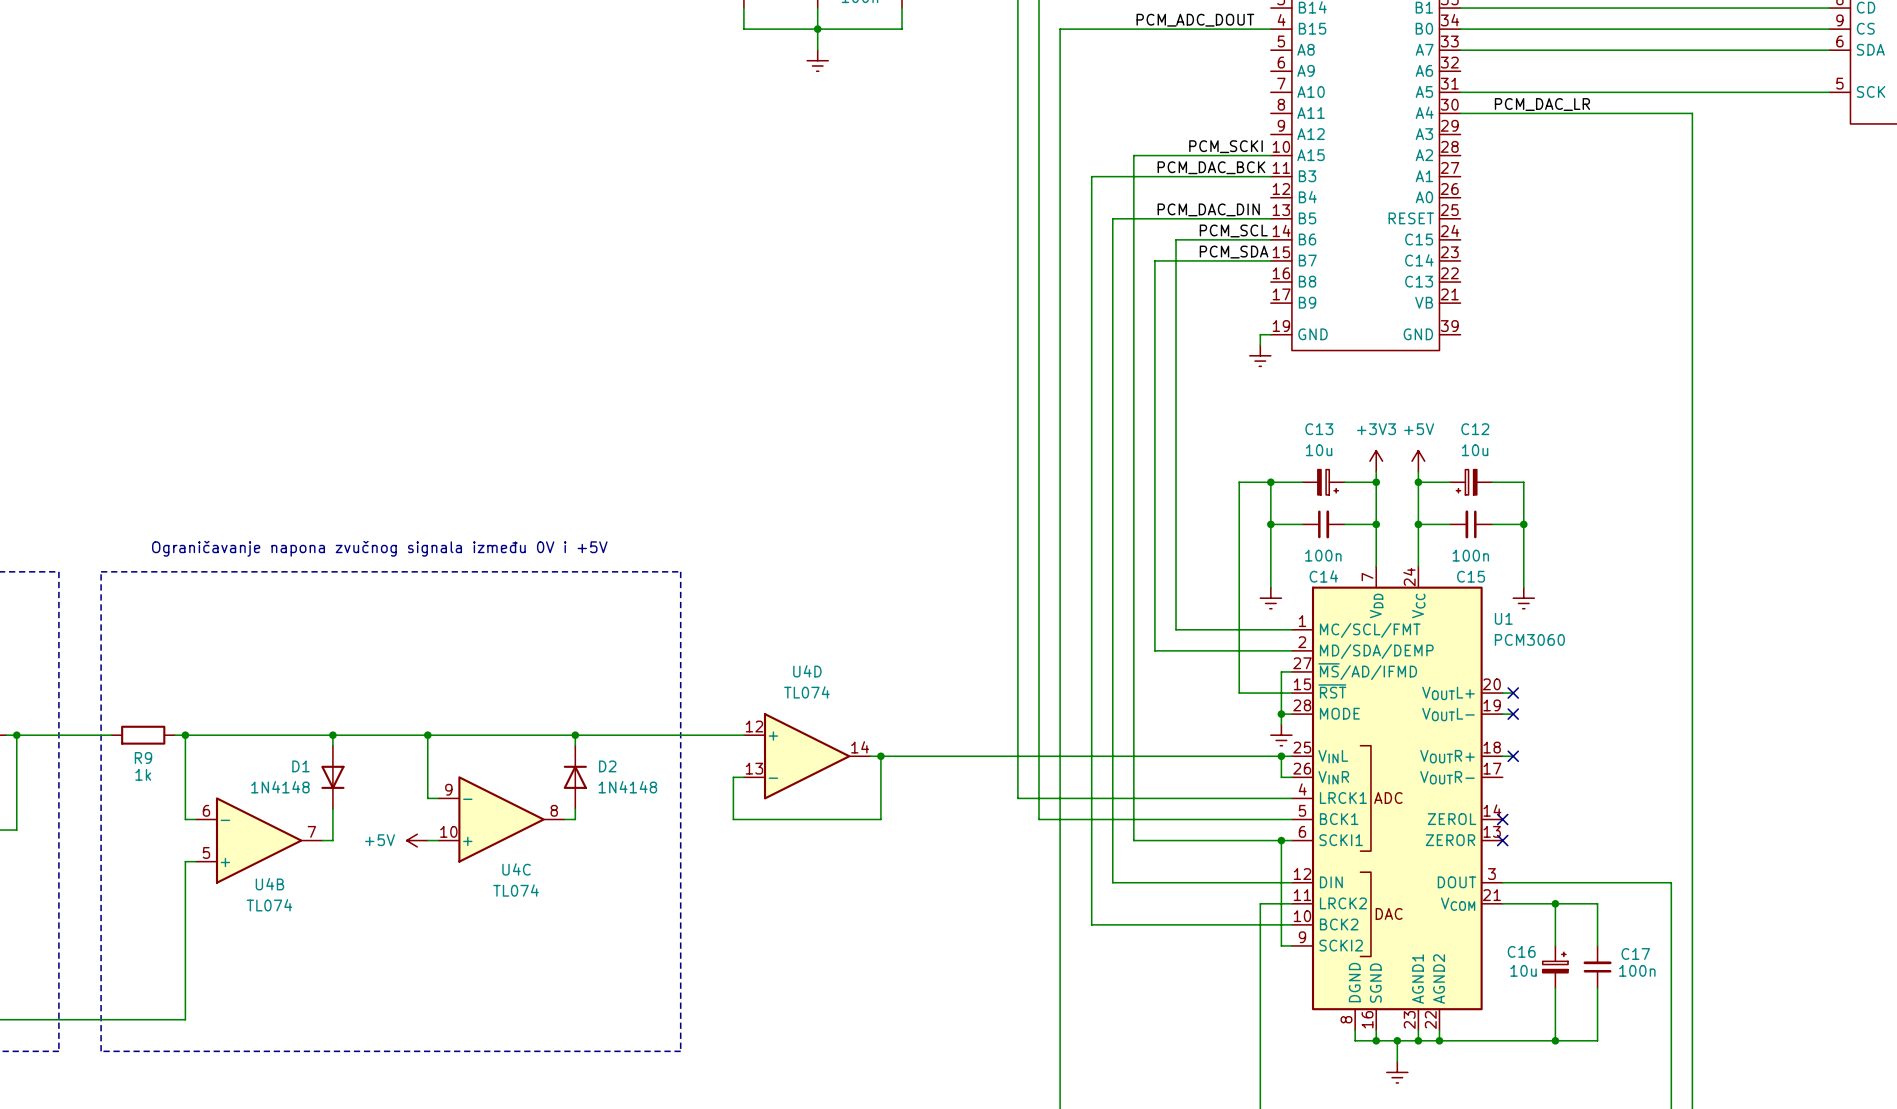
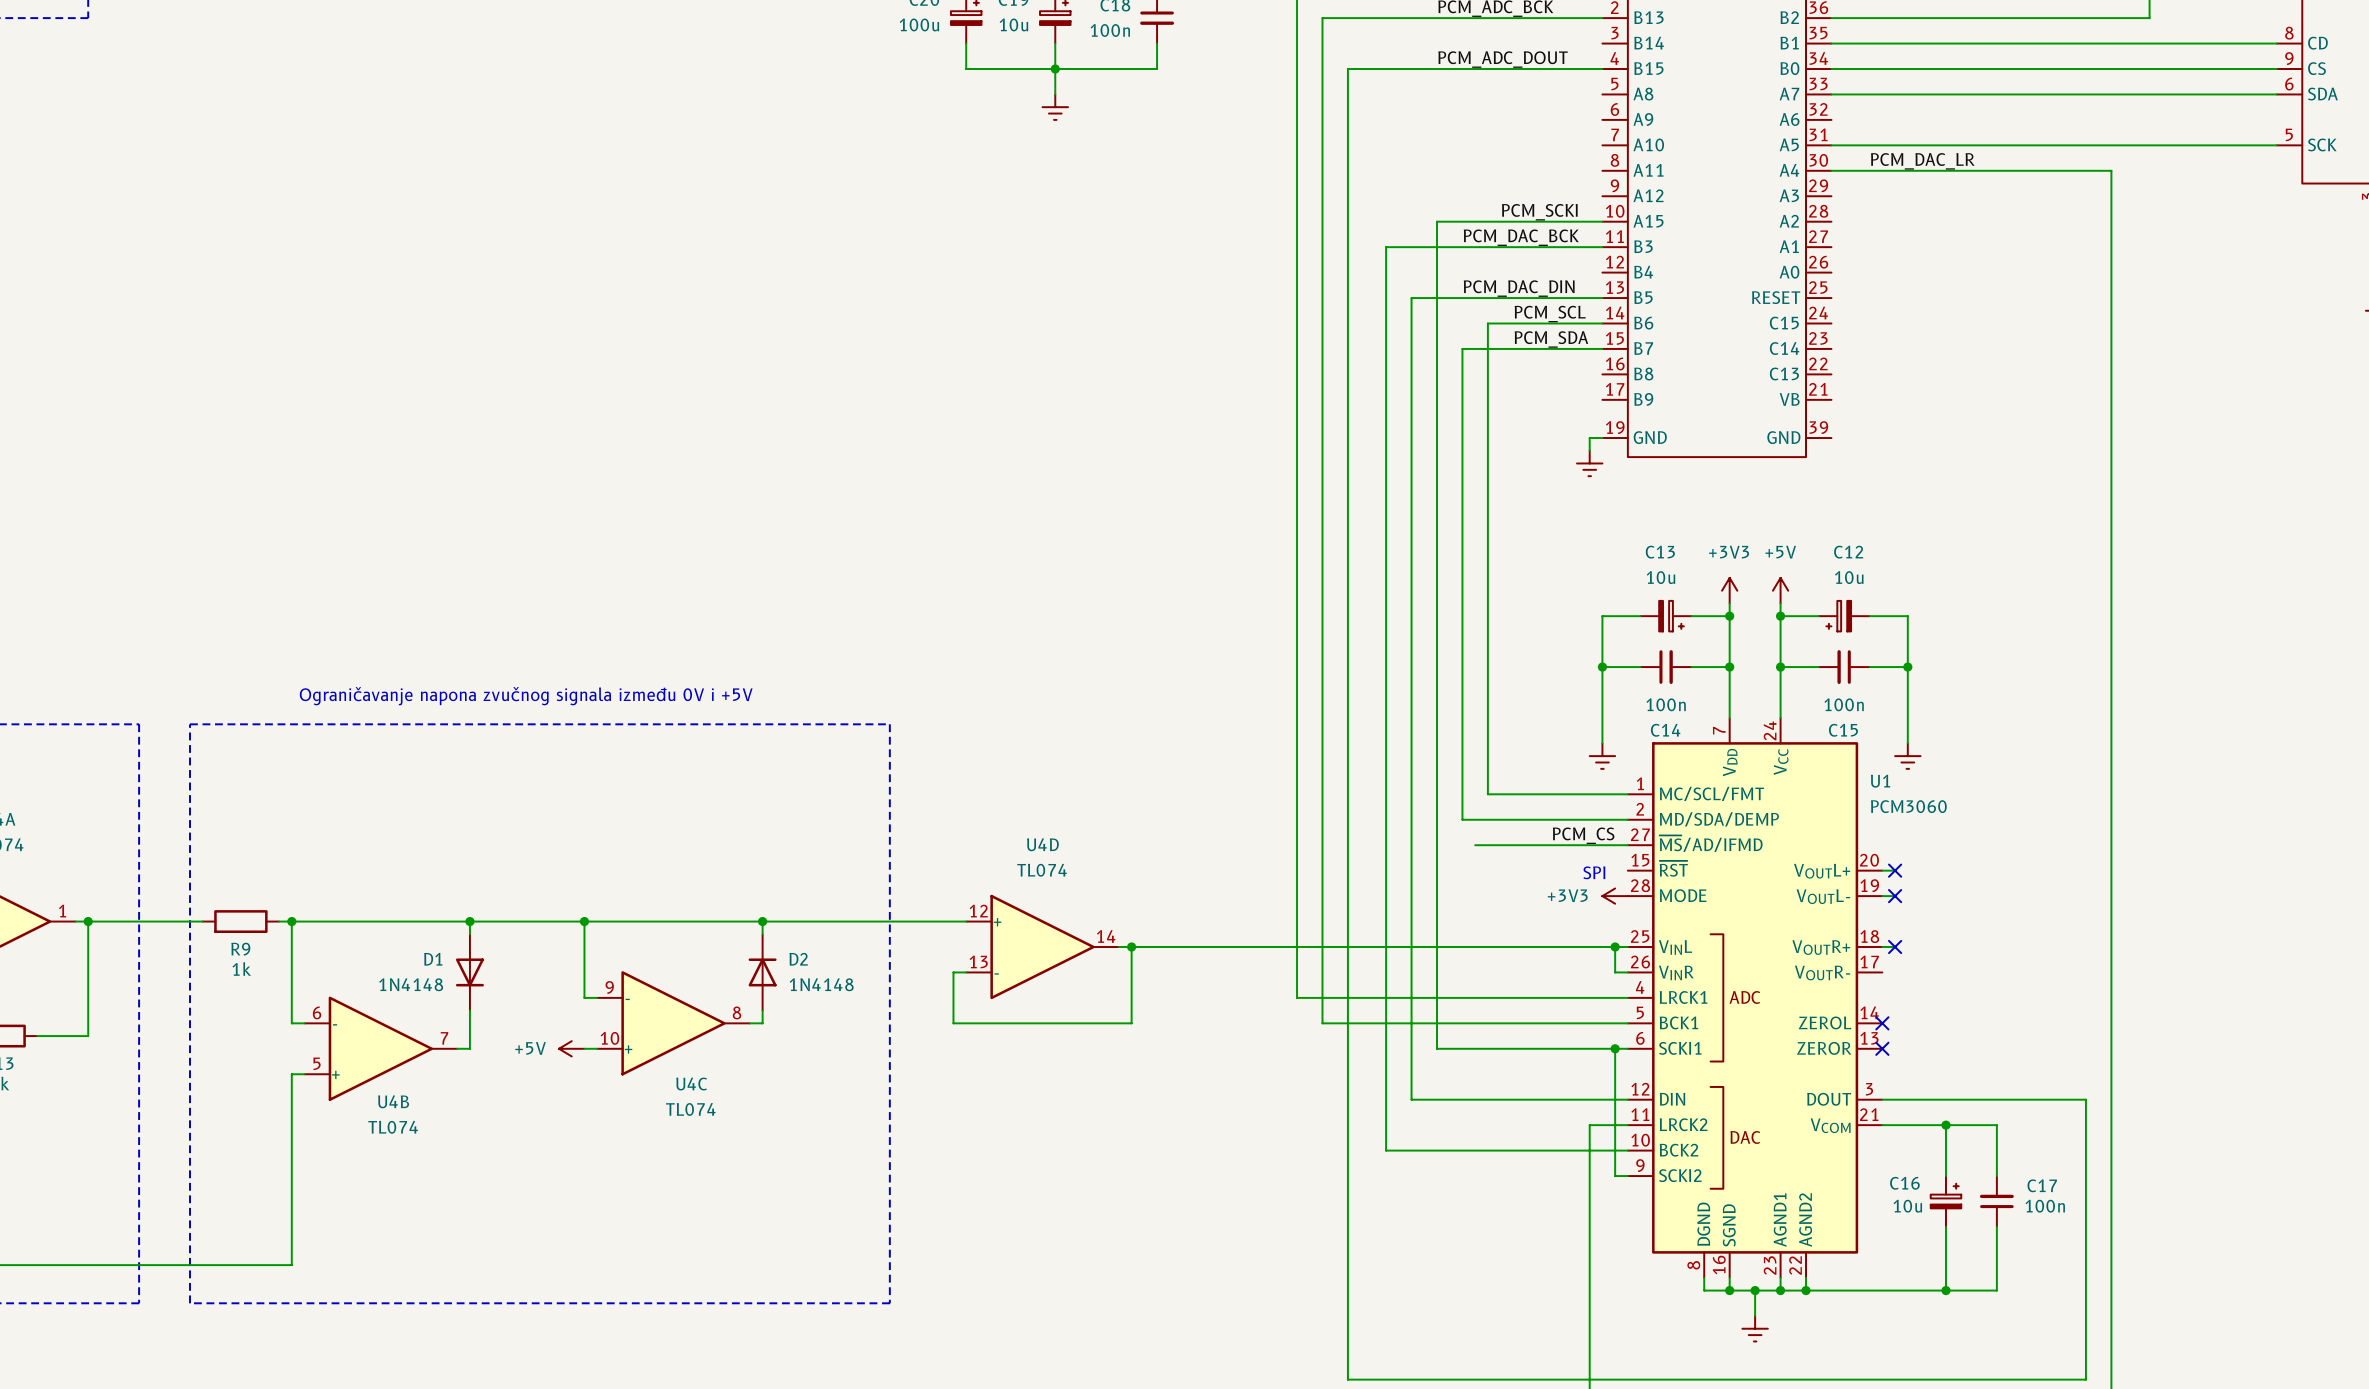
wire: (1270, 482) (1239, 482) (1239, 693) (1291, 693) -> none
junction: (1270, 482) -> none
label: none -> PCM_CS (1583, 835)
wire: (1281, 671) (1281, 724) -> (1615, 845) (1475, 845)
text: none -> SPI (1594, 872)
junction: (1281, 714) -> none
power symbol: none -> +3V3 (1615, 896)
power symbol: (1281, 735) -> none

